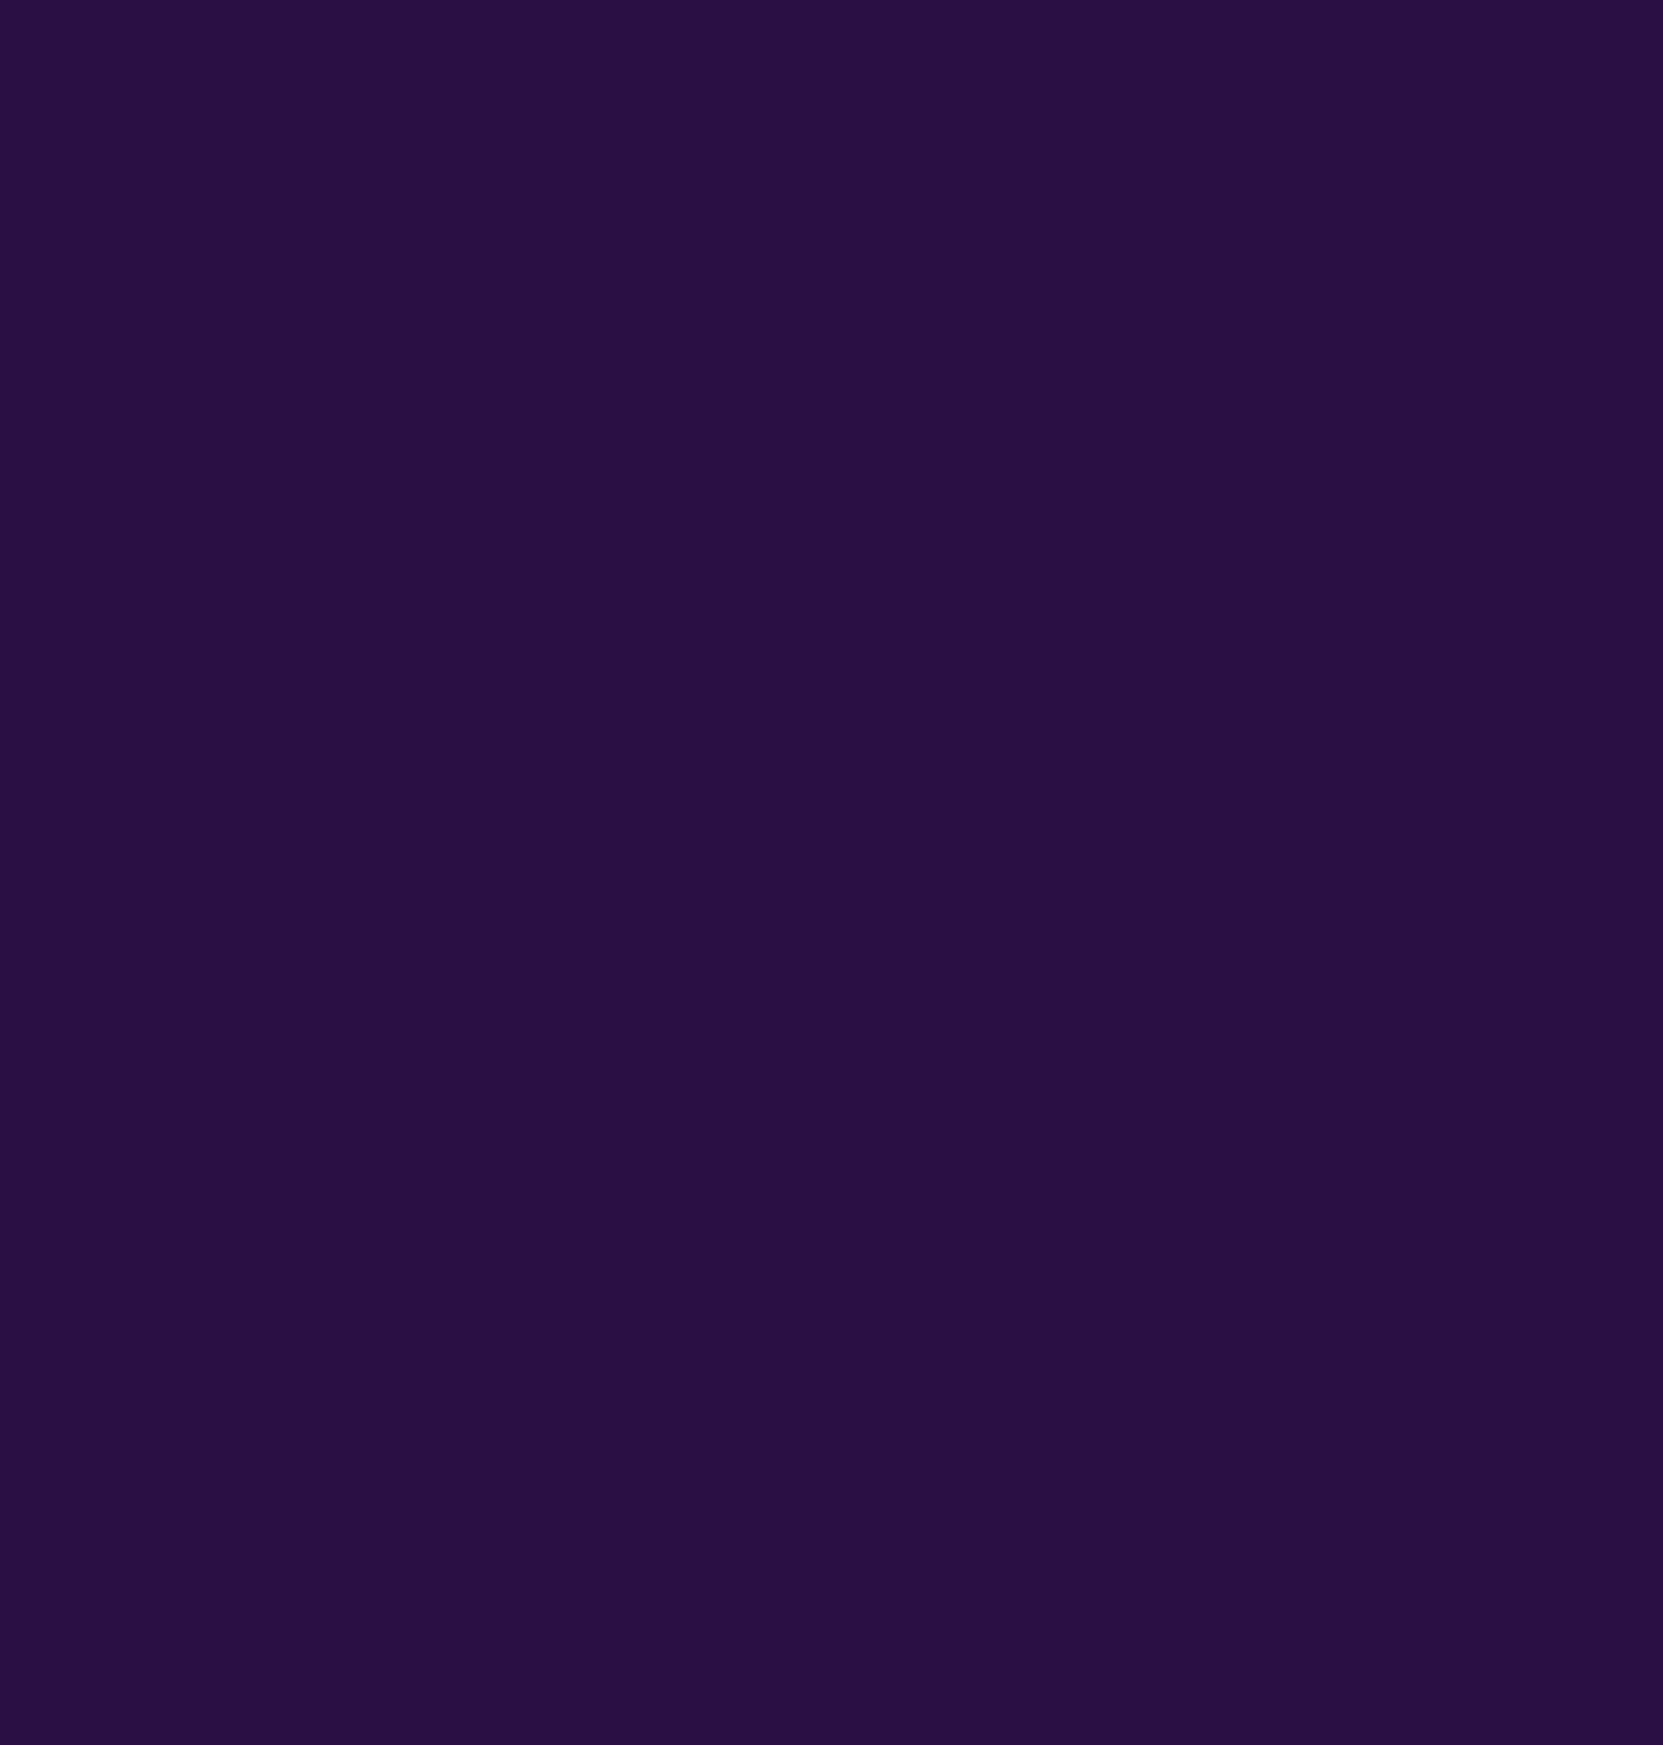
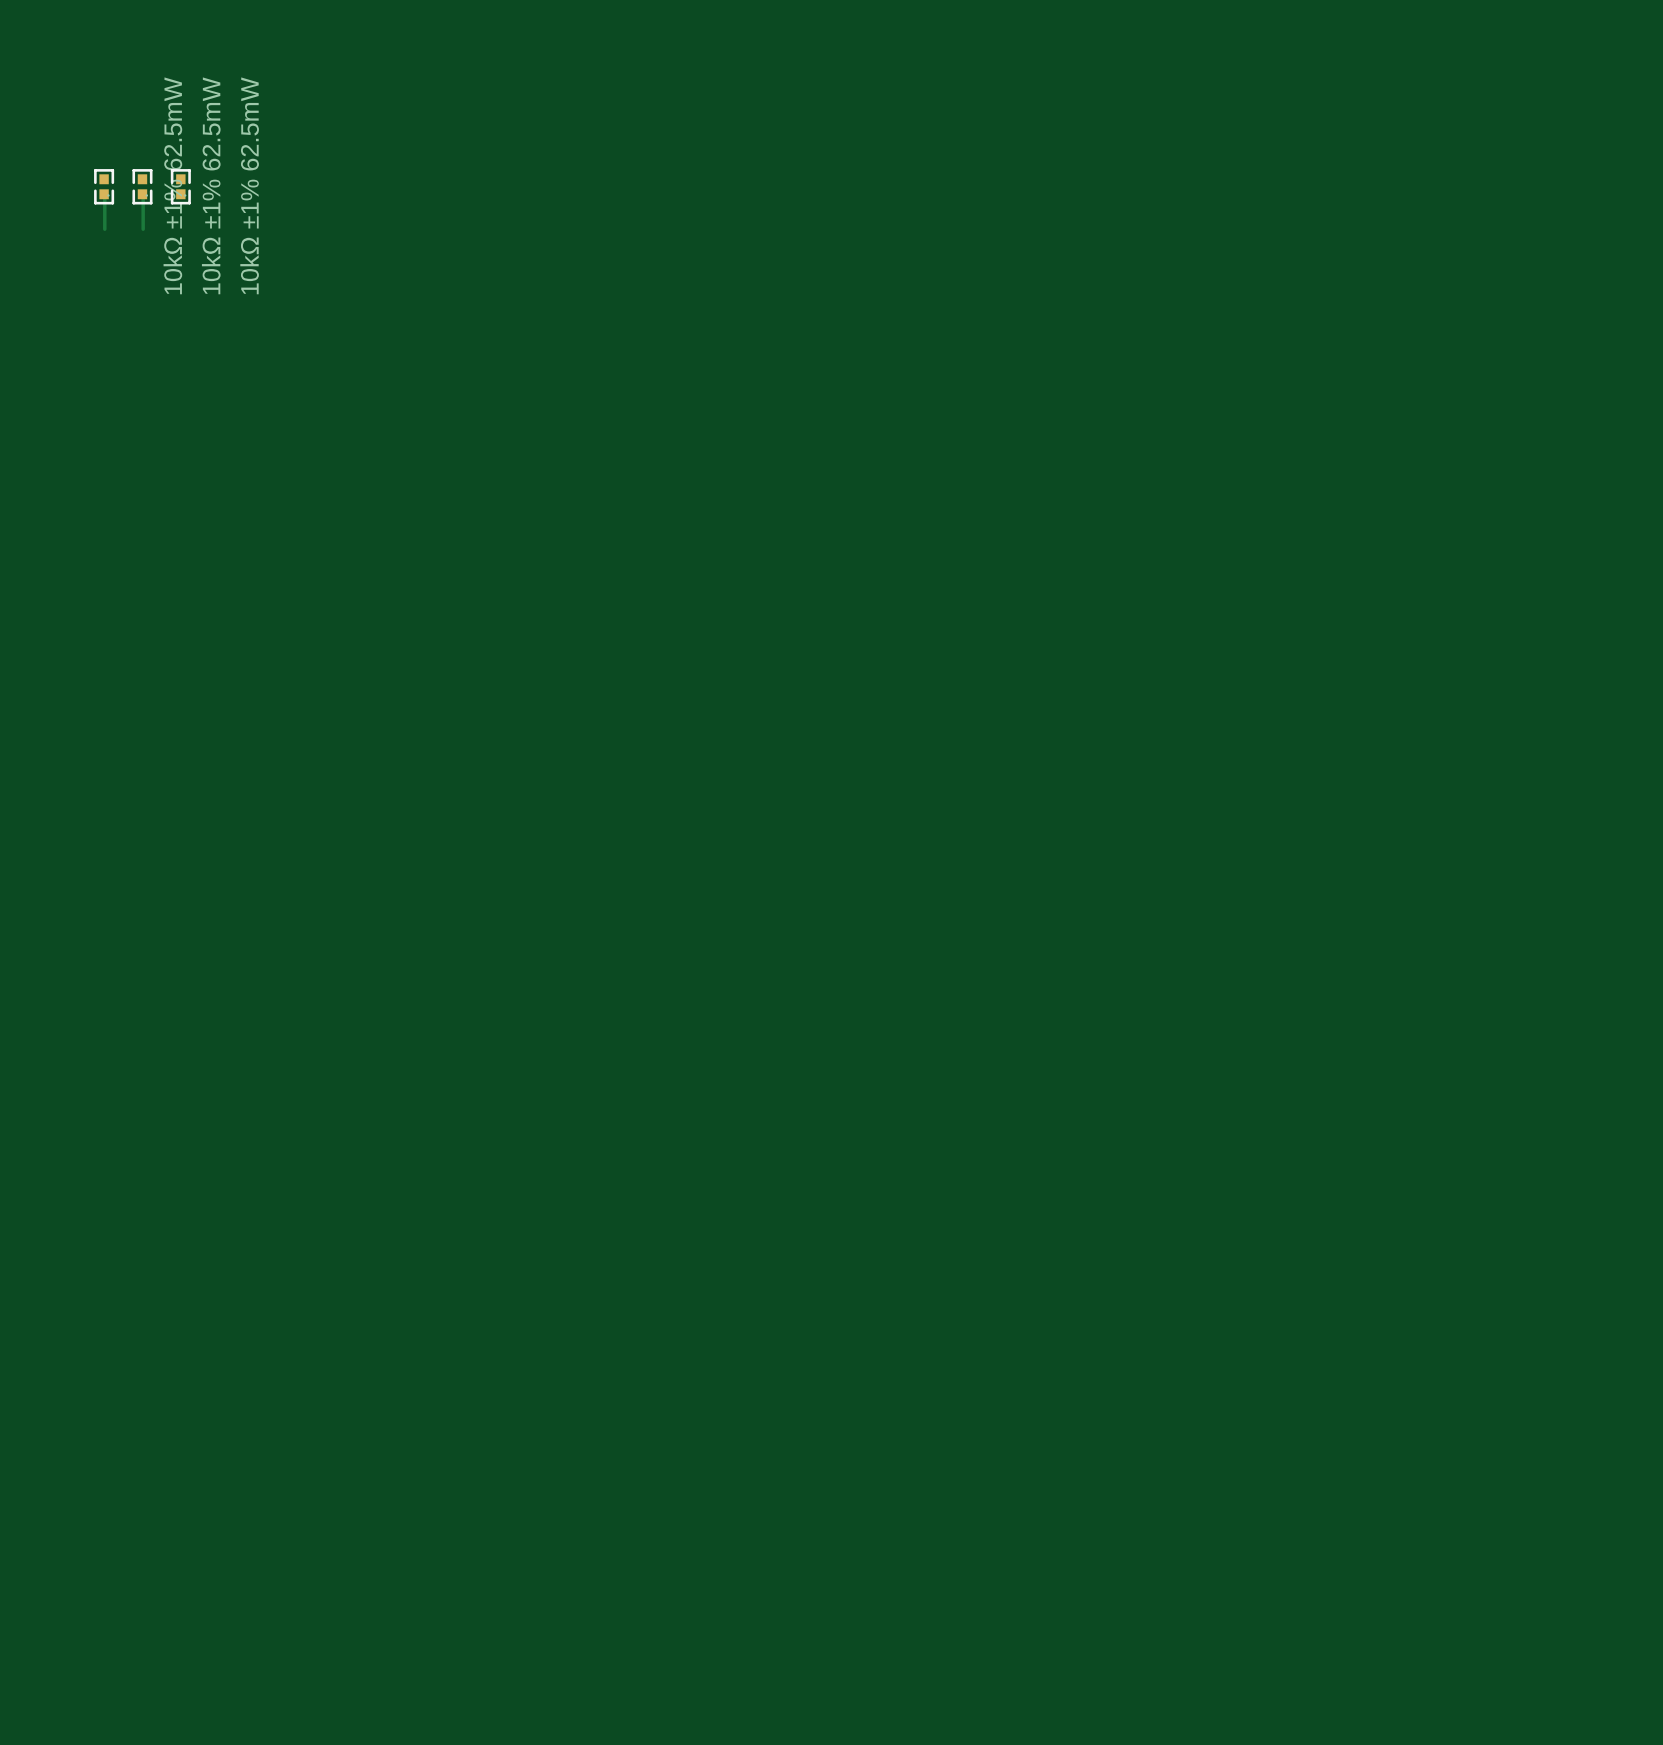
part: none -> 10kΩ ±1% 62.5mW (104, 186)
part: none -> 10kΩ ±1% 62.5mW (142, 186)
part: none -> 10kΩ ±1% 62.5mW (180, 186)
track: none -> (104, 194) (104, 229)
track: none -> (142, 194) (143, 229)

